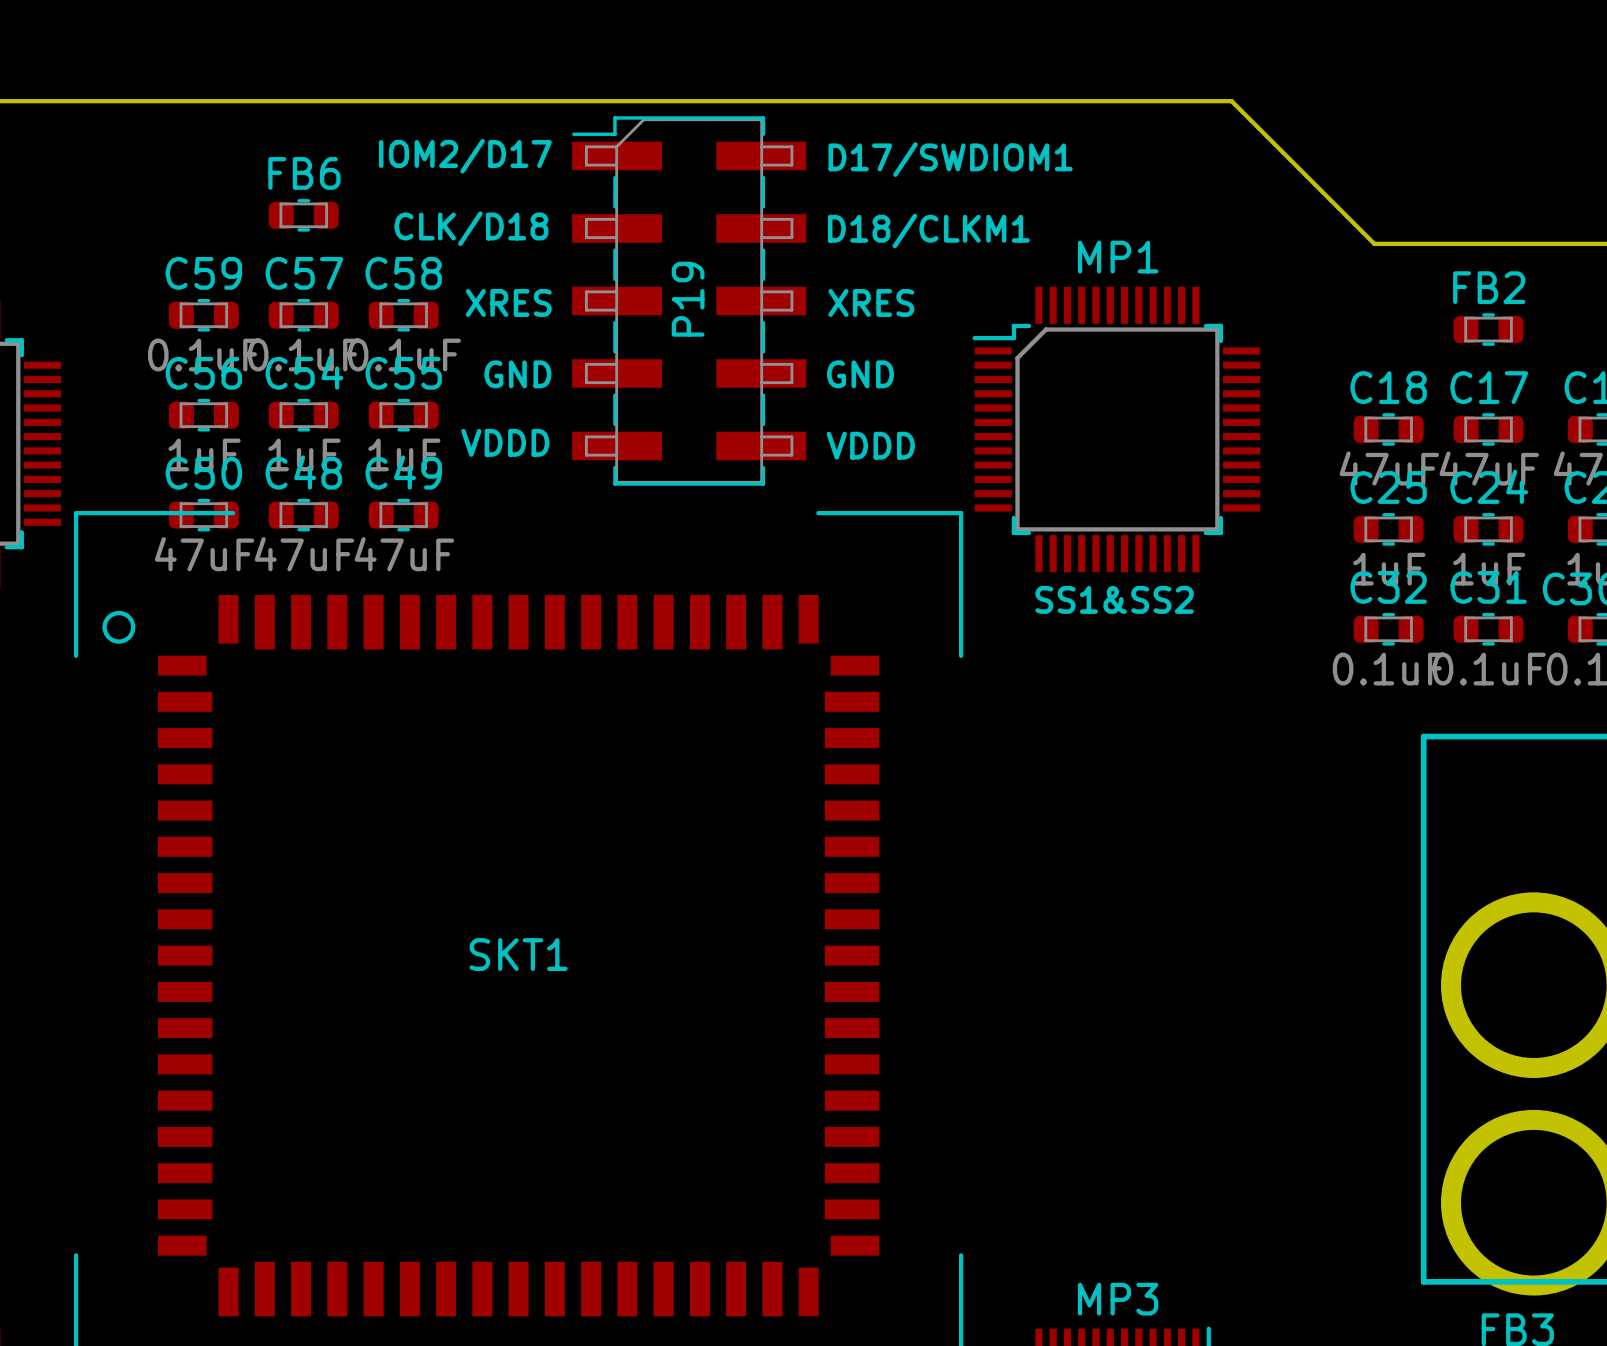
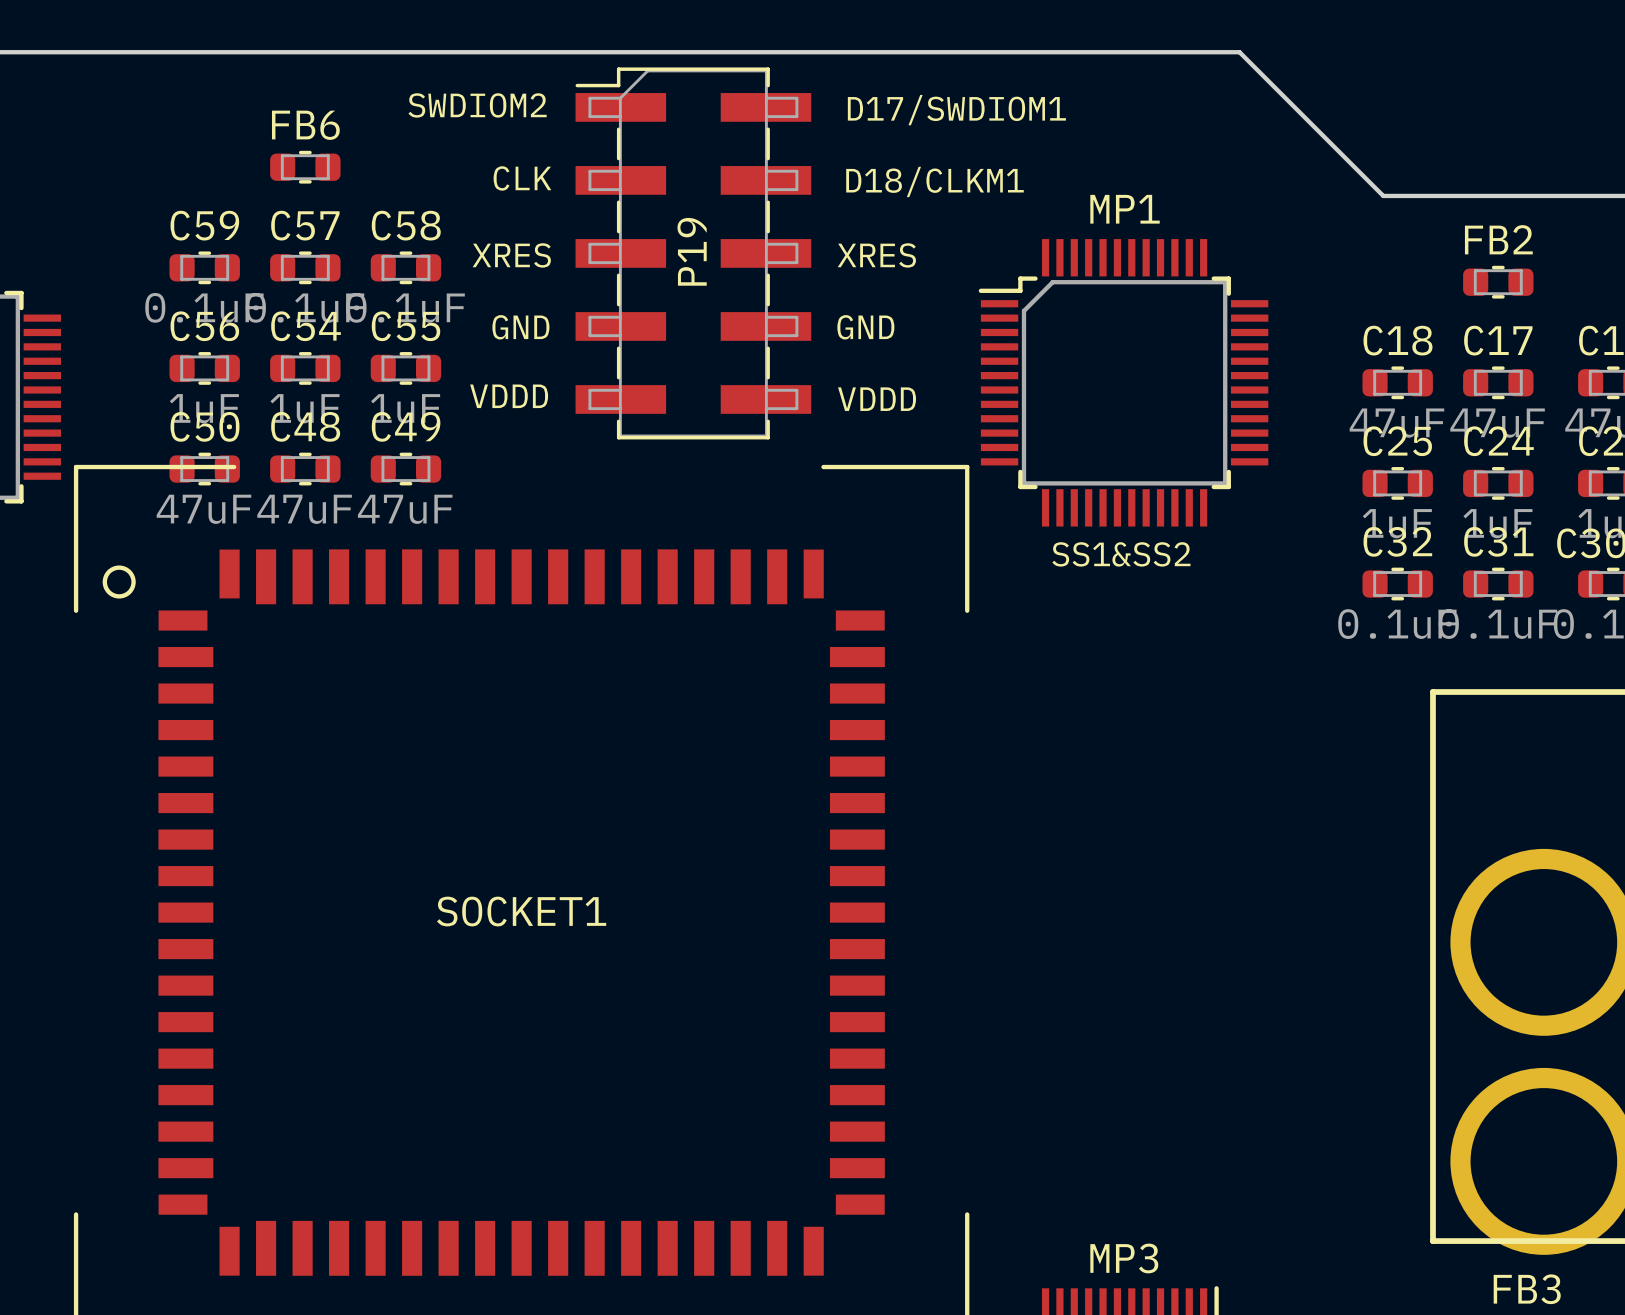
text: IOM2/D17 (465, 156) -> SWDIOM2 (477, 105)
text: none -> CLK (522, 178)
text: CLK/D18 (471, 228) -> none
SKT1 name: SKT1 (518, 954) -> SOCKET1 (521, 911)

